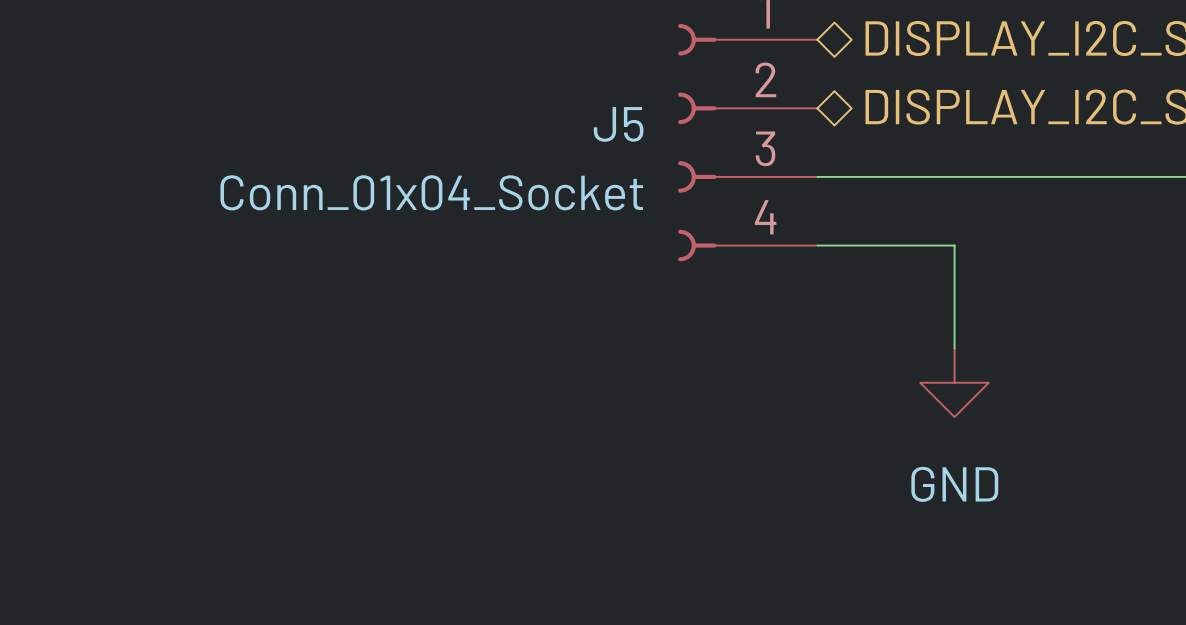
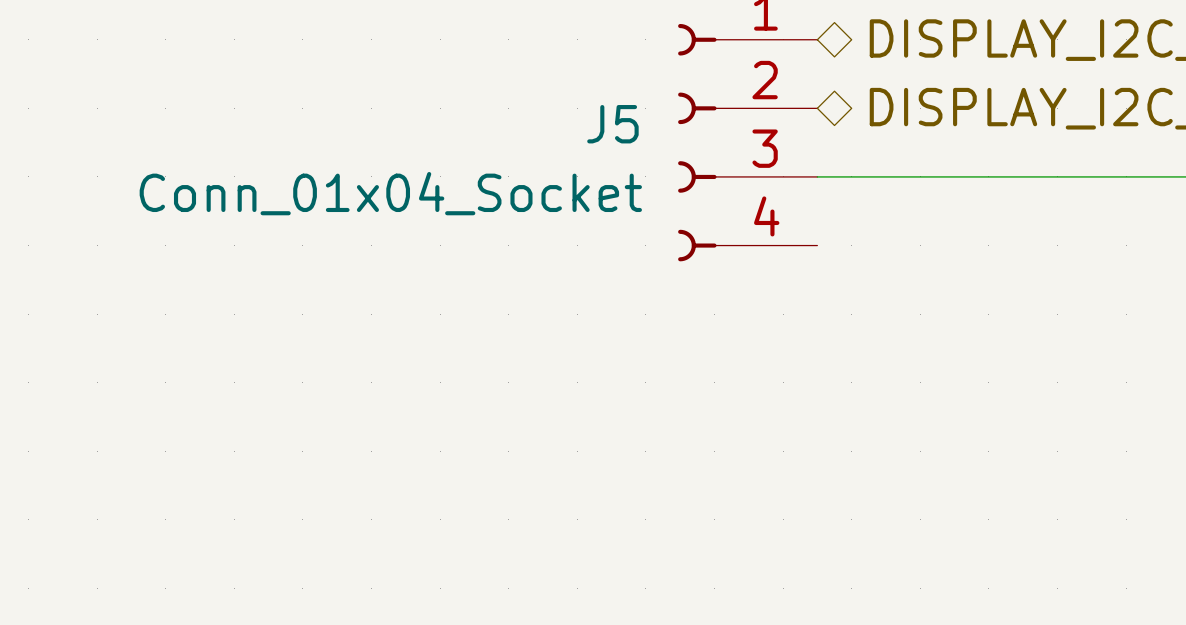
wire: (817, 245) (954, 245) (954, 348) -> none
power symbol: GND (954, 382) -> none

